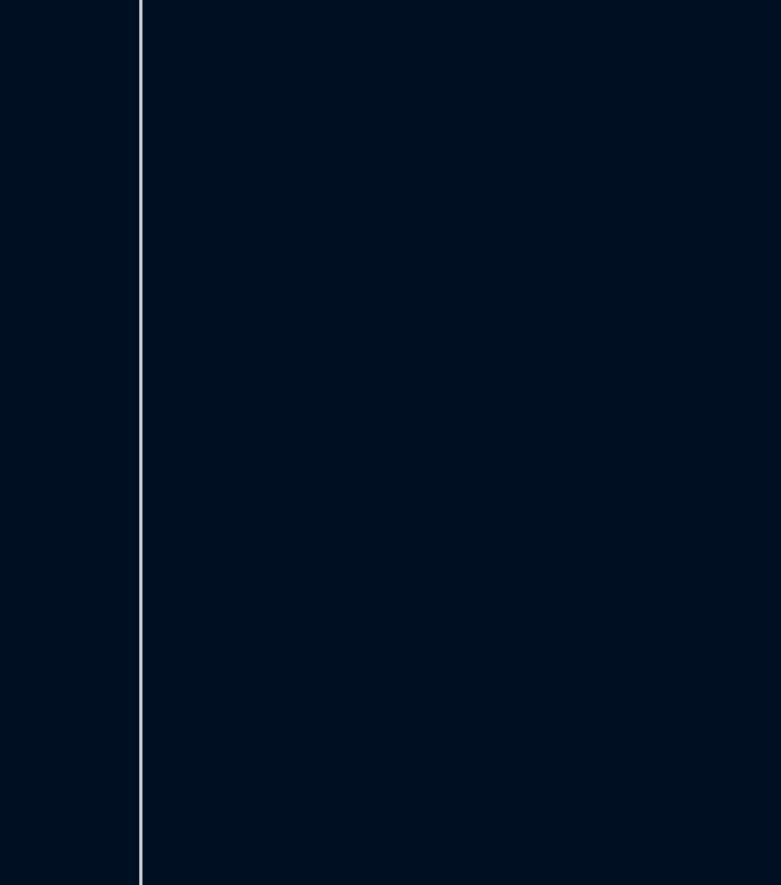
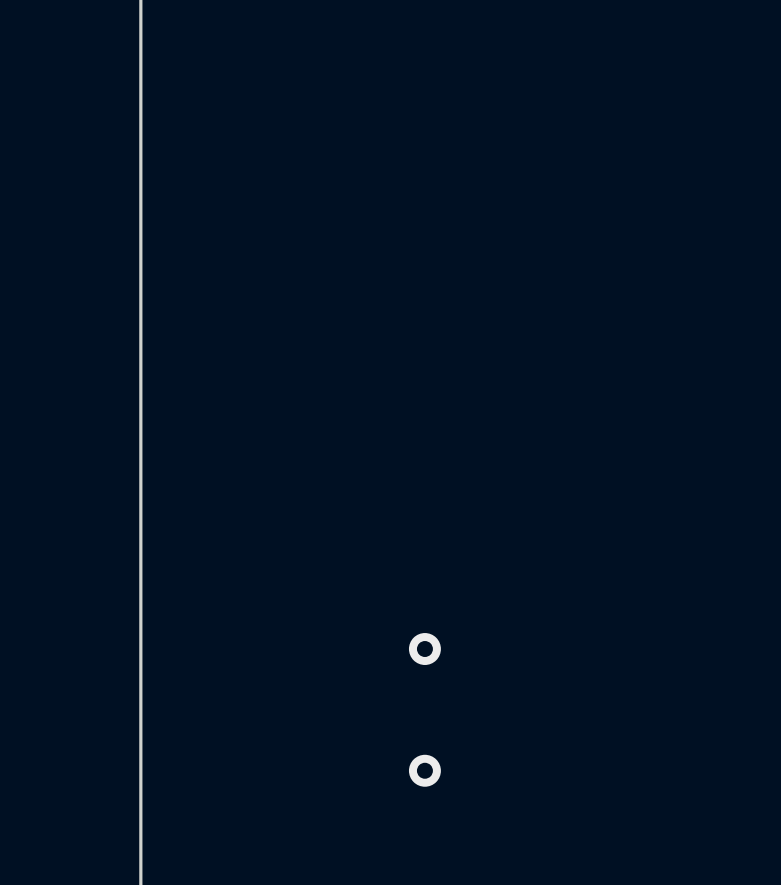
via: none -> (424, 649)
via: none -> (424, 770)

